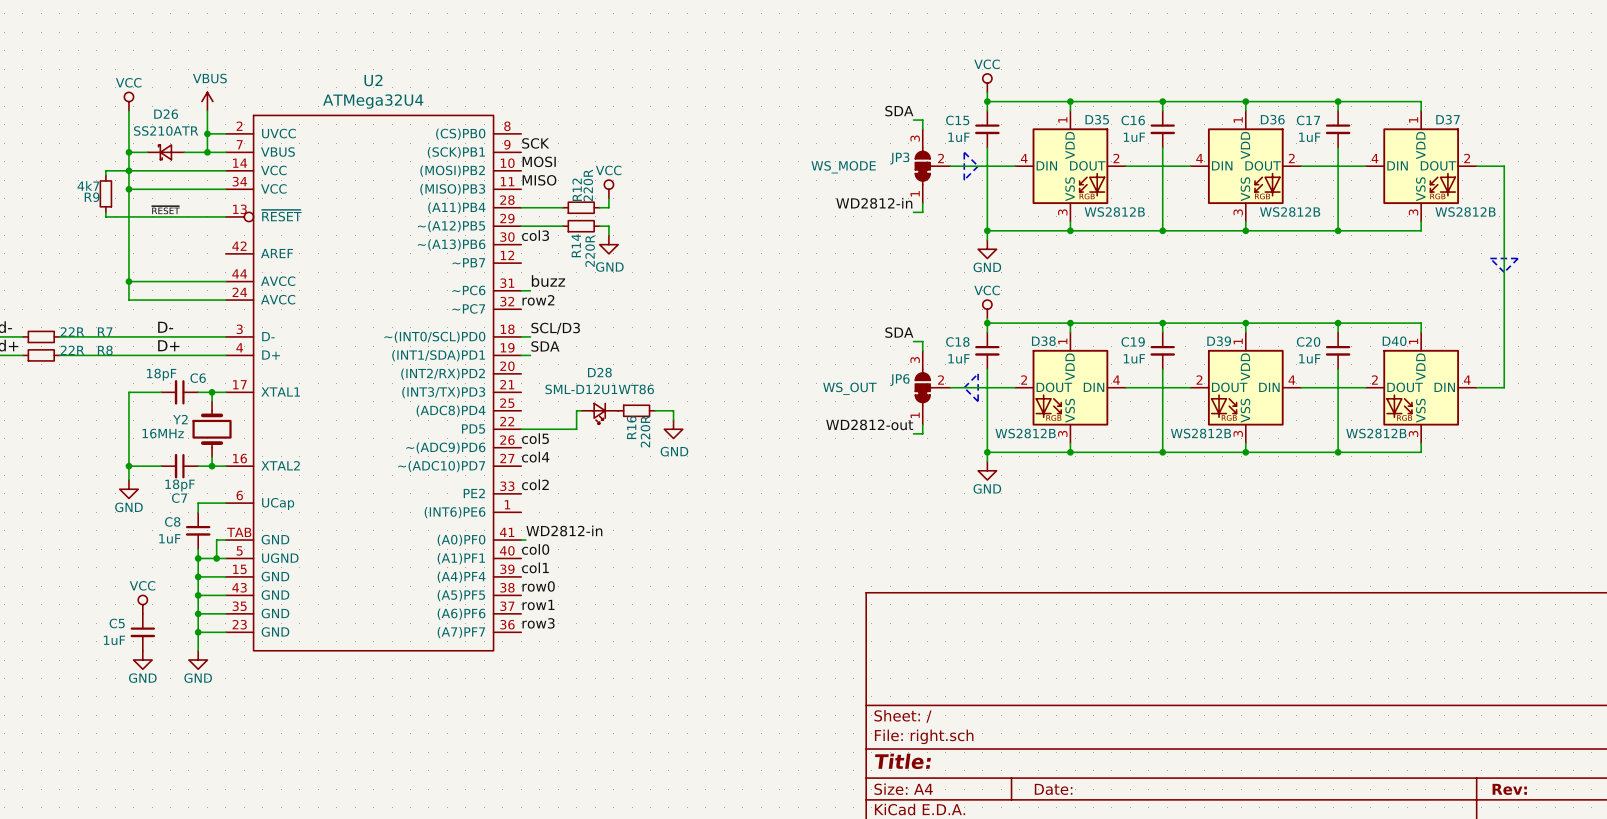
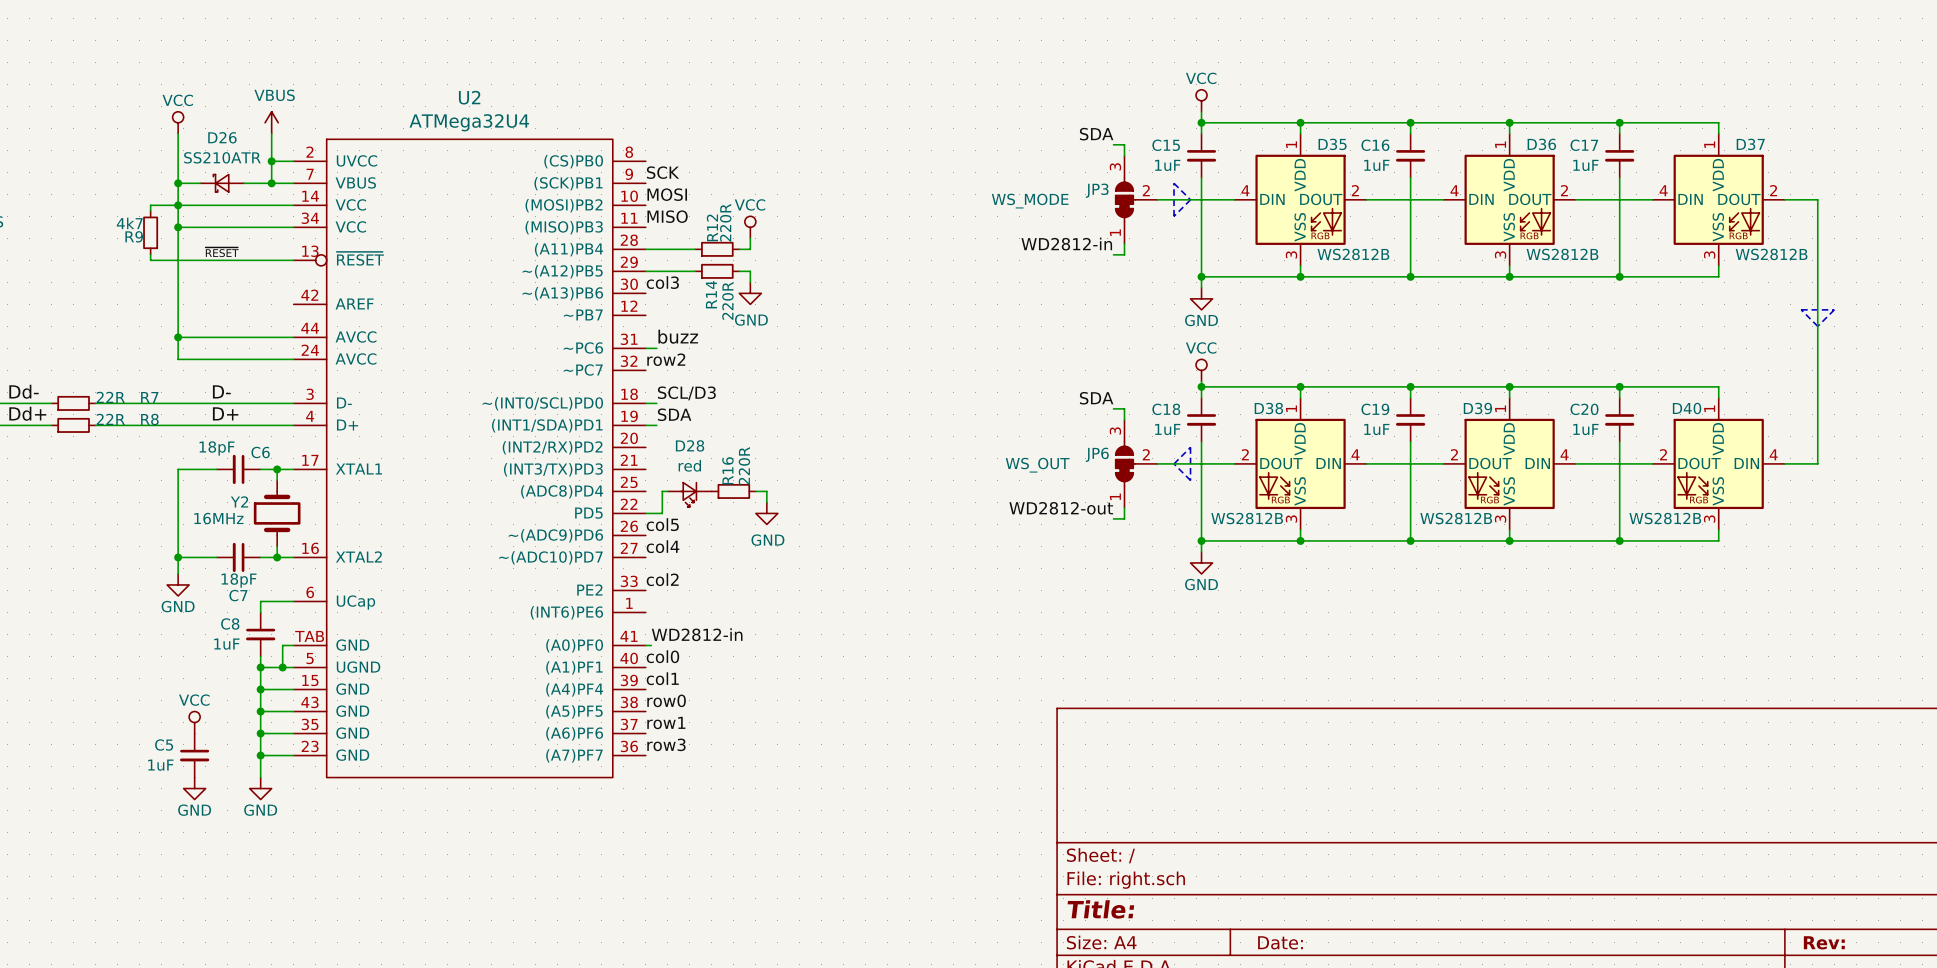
D28 value: SML-D12U1WT86 (599, 389) -> red (689, 465)
wire: (581, 410) (576, 410) (576, 429) (535, 429) -> (667, 491) (662, 491) (662, 513)
R16 position: (636, 410) -> (733, 491)
wire: (655, 410) (673, 410) (673, 420) -> none
D28 position: (599, 413) -> (689, 494)
R16 name position: R16 (631, 427) -> R16 (727, 470)
power symbol position: GND (673, 429) -> GND (766, 513)
R16 value position: 220R (645, 431) -> 220R (744, 465)

